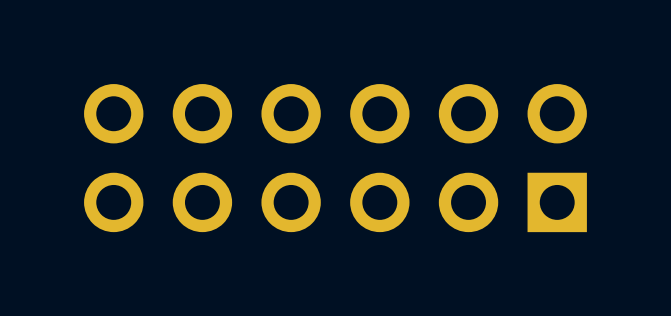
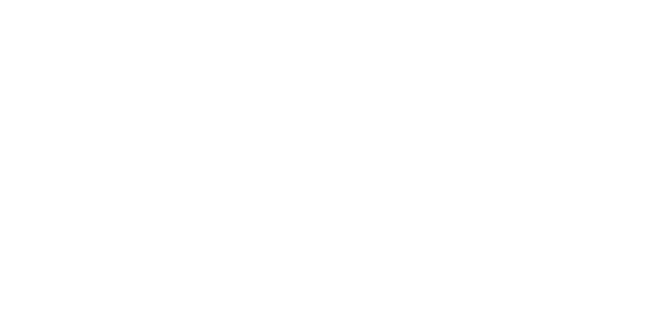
part: (335, 158) -> none

